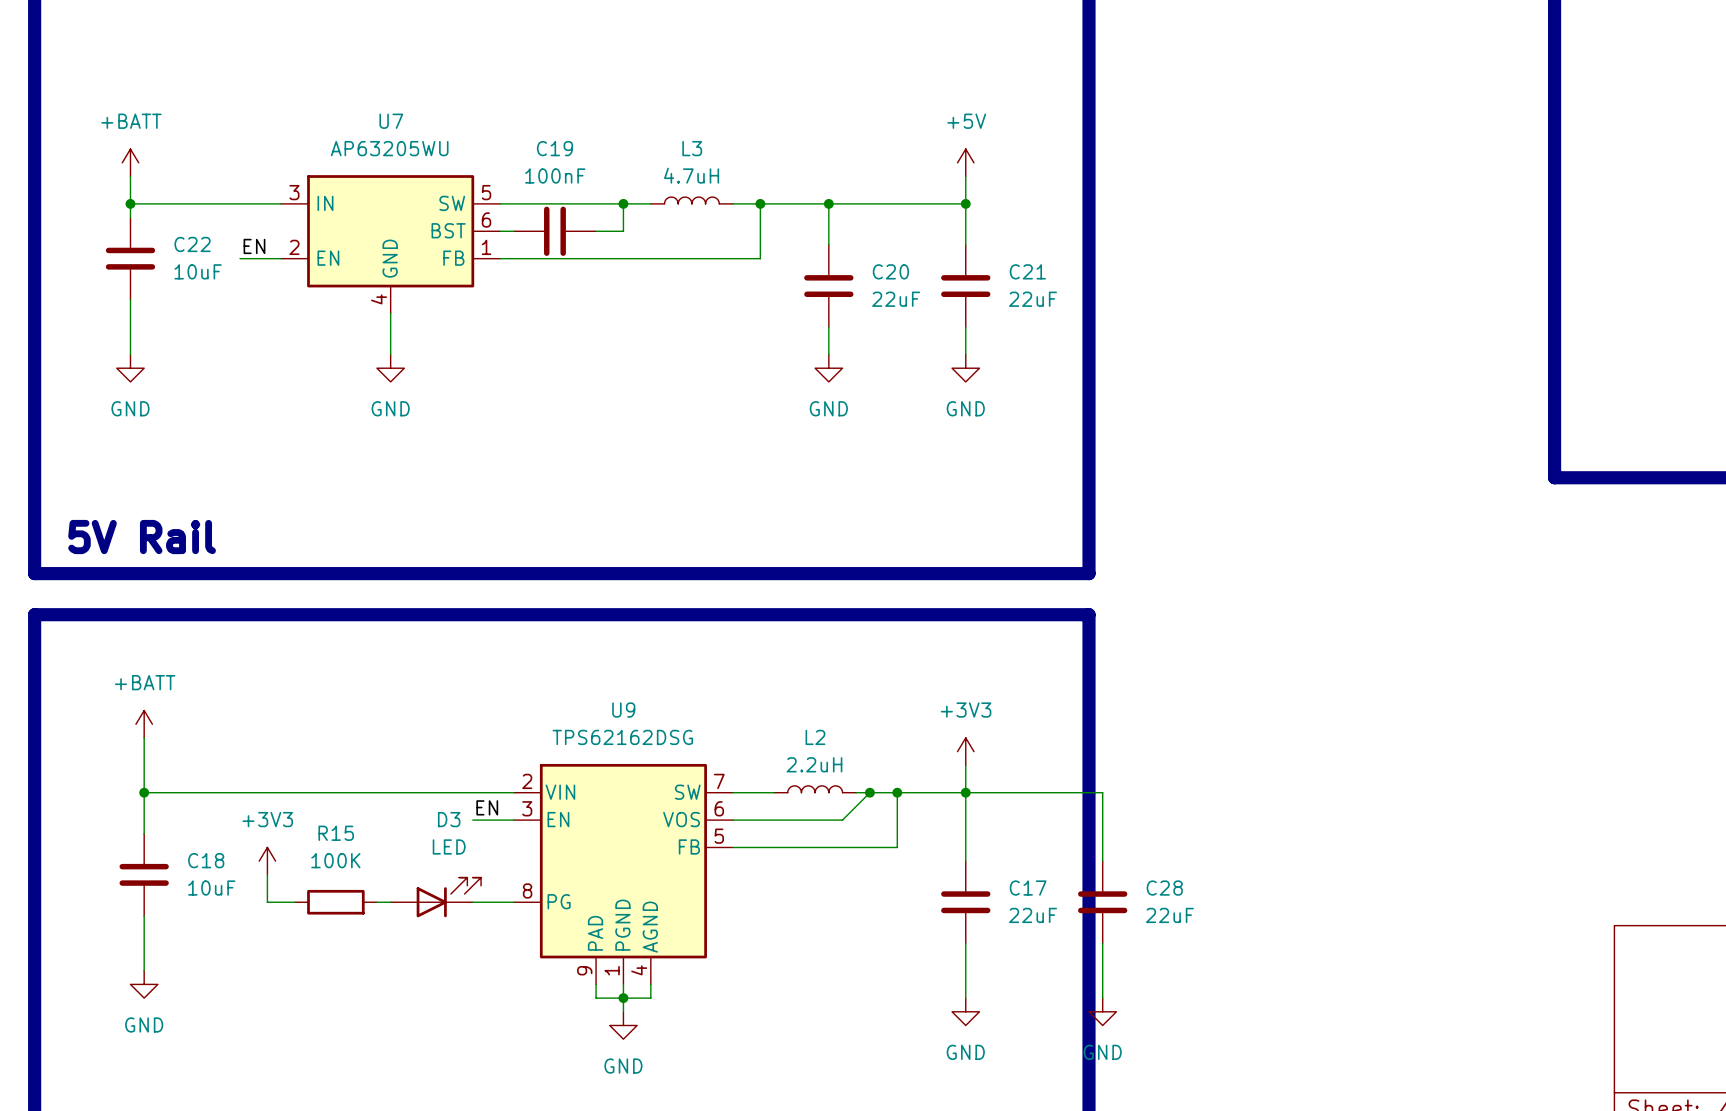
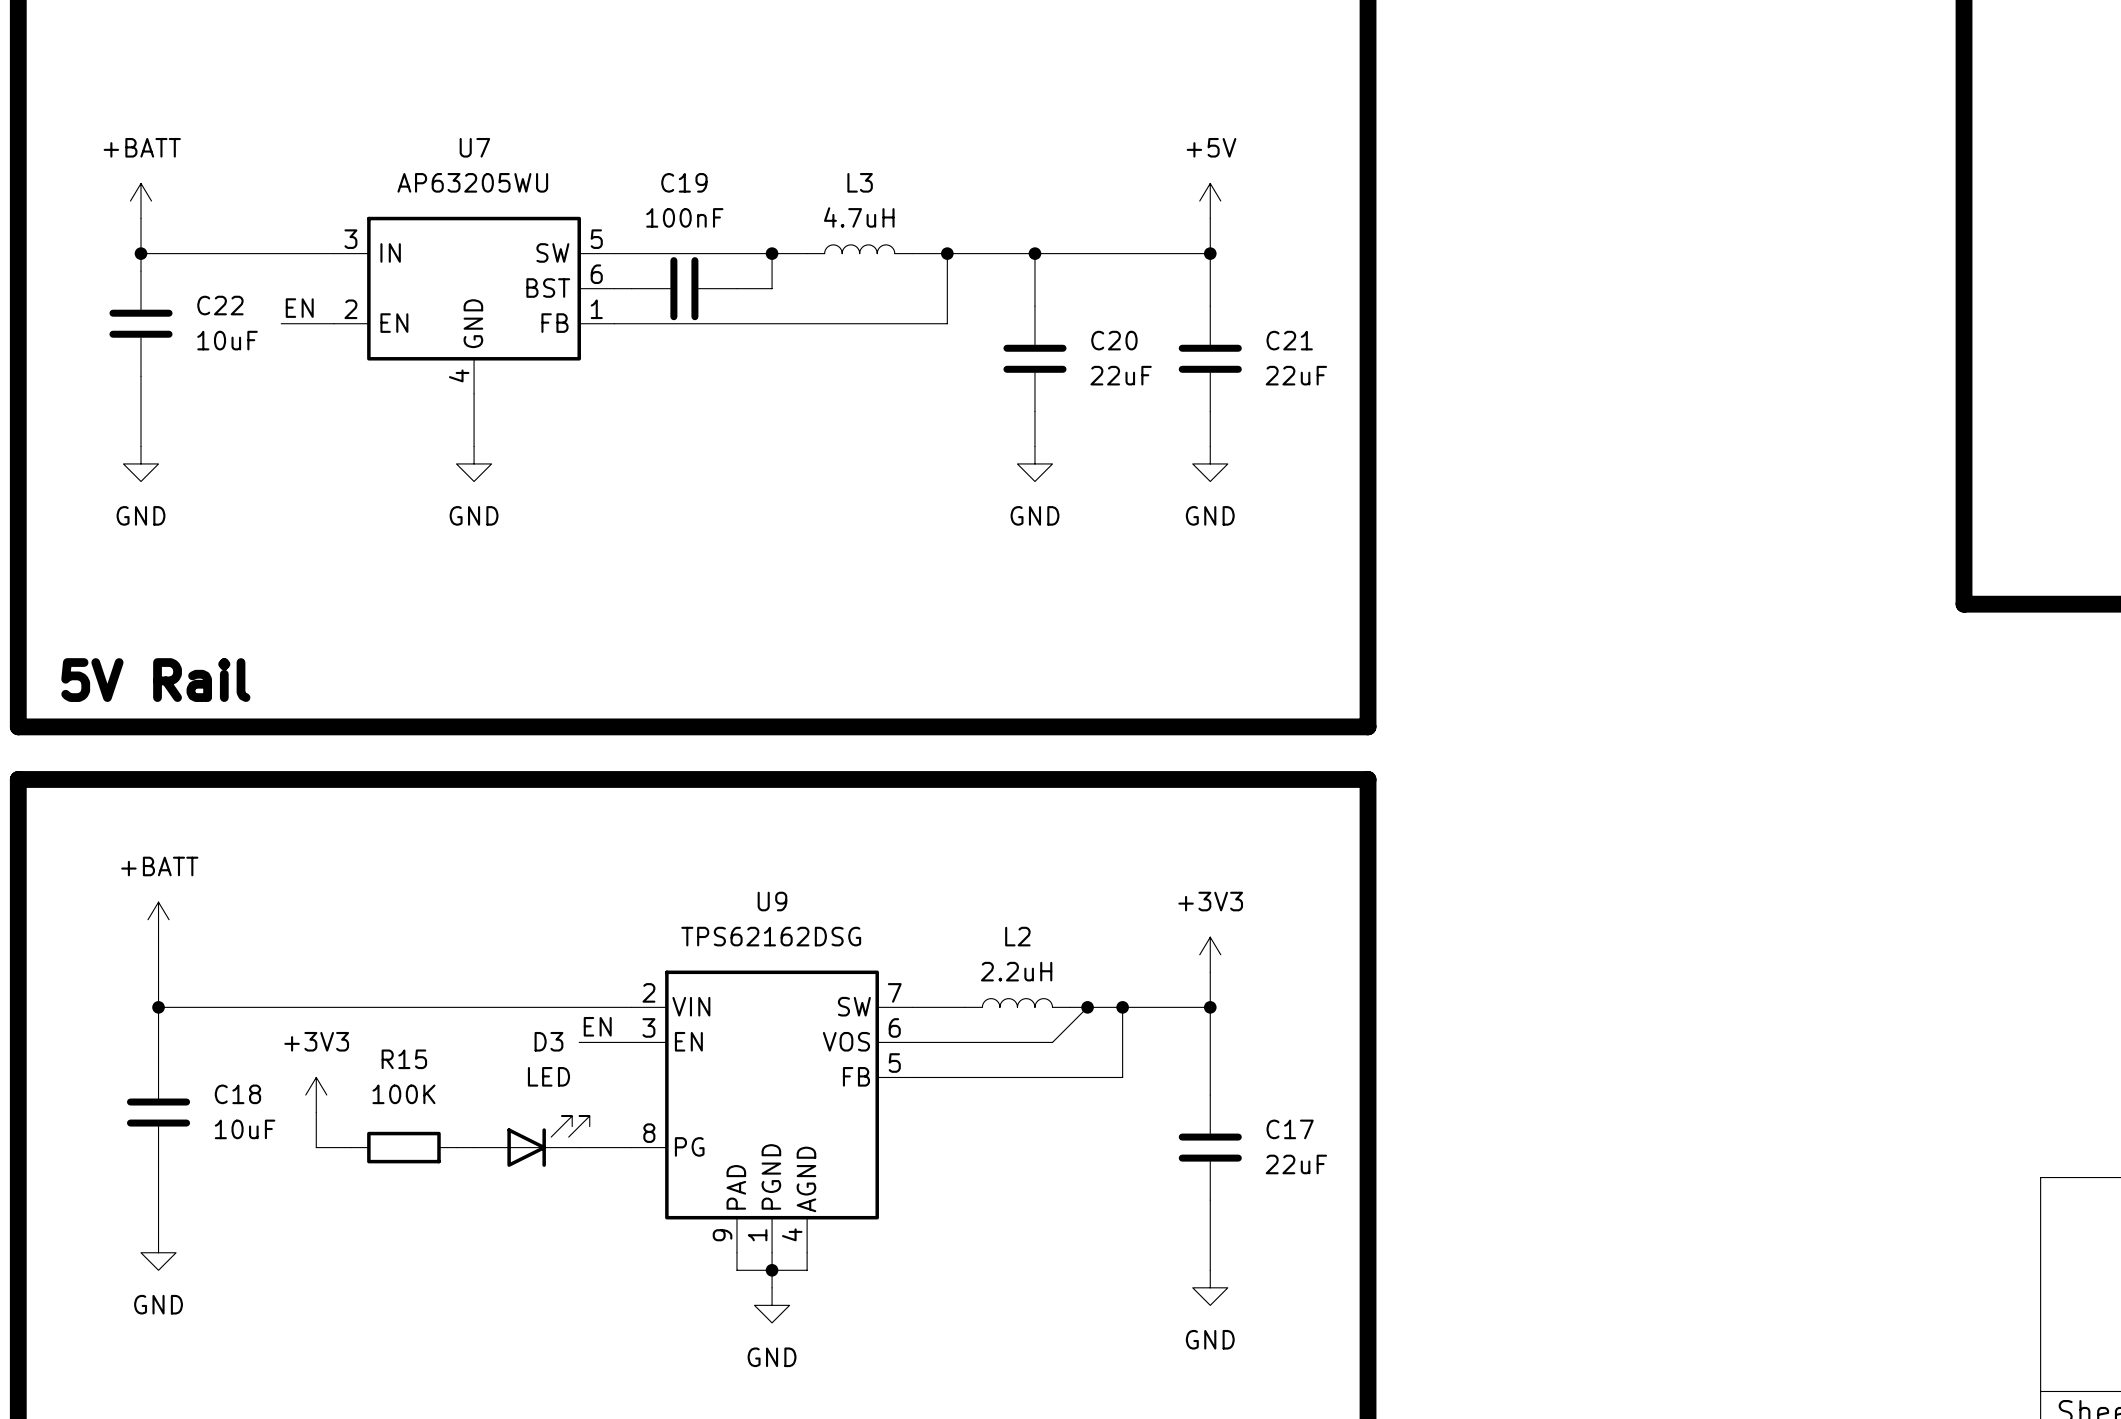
wire: (965, 792) (1102, 792) (1102, 861) -> none
C28: 22uF (1102, 902) -> none
wire: (1102, 943) (1102, 998) -> none
power symbol: GND (1102, 1011) -> none

